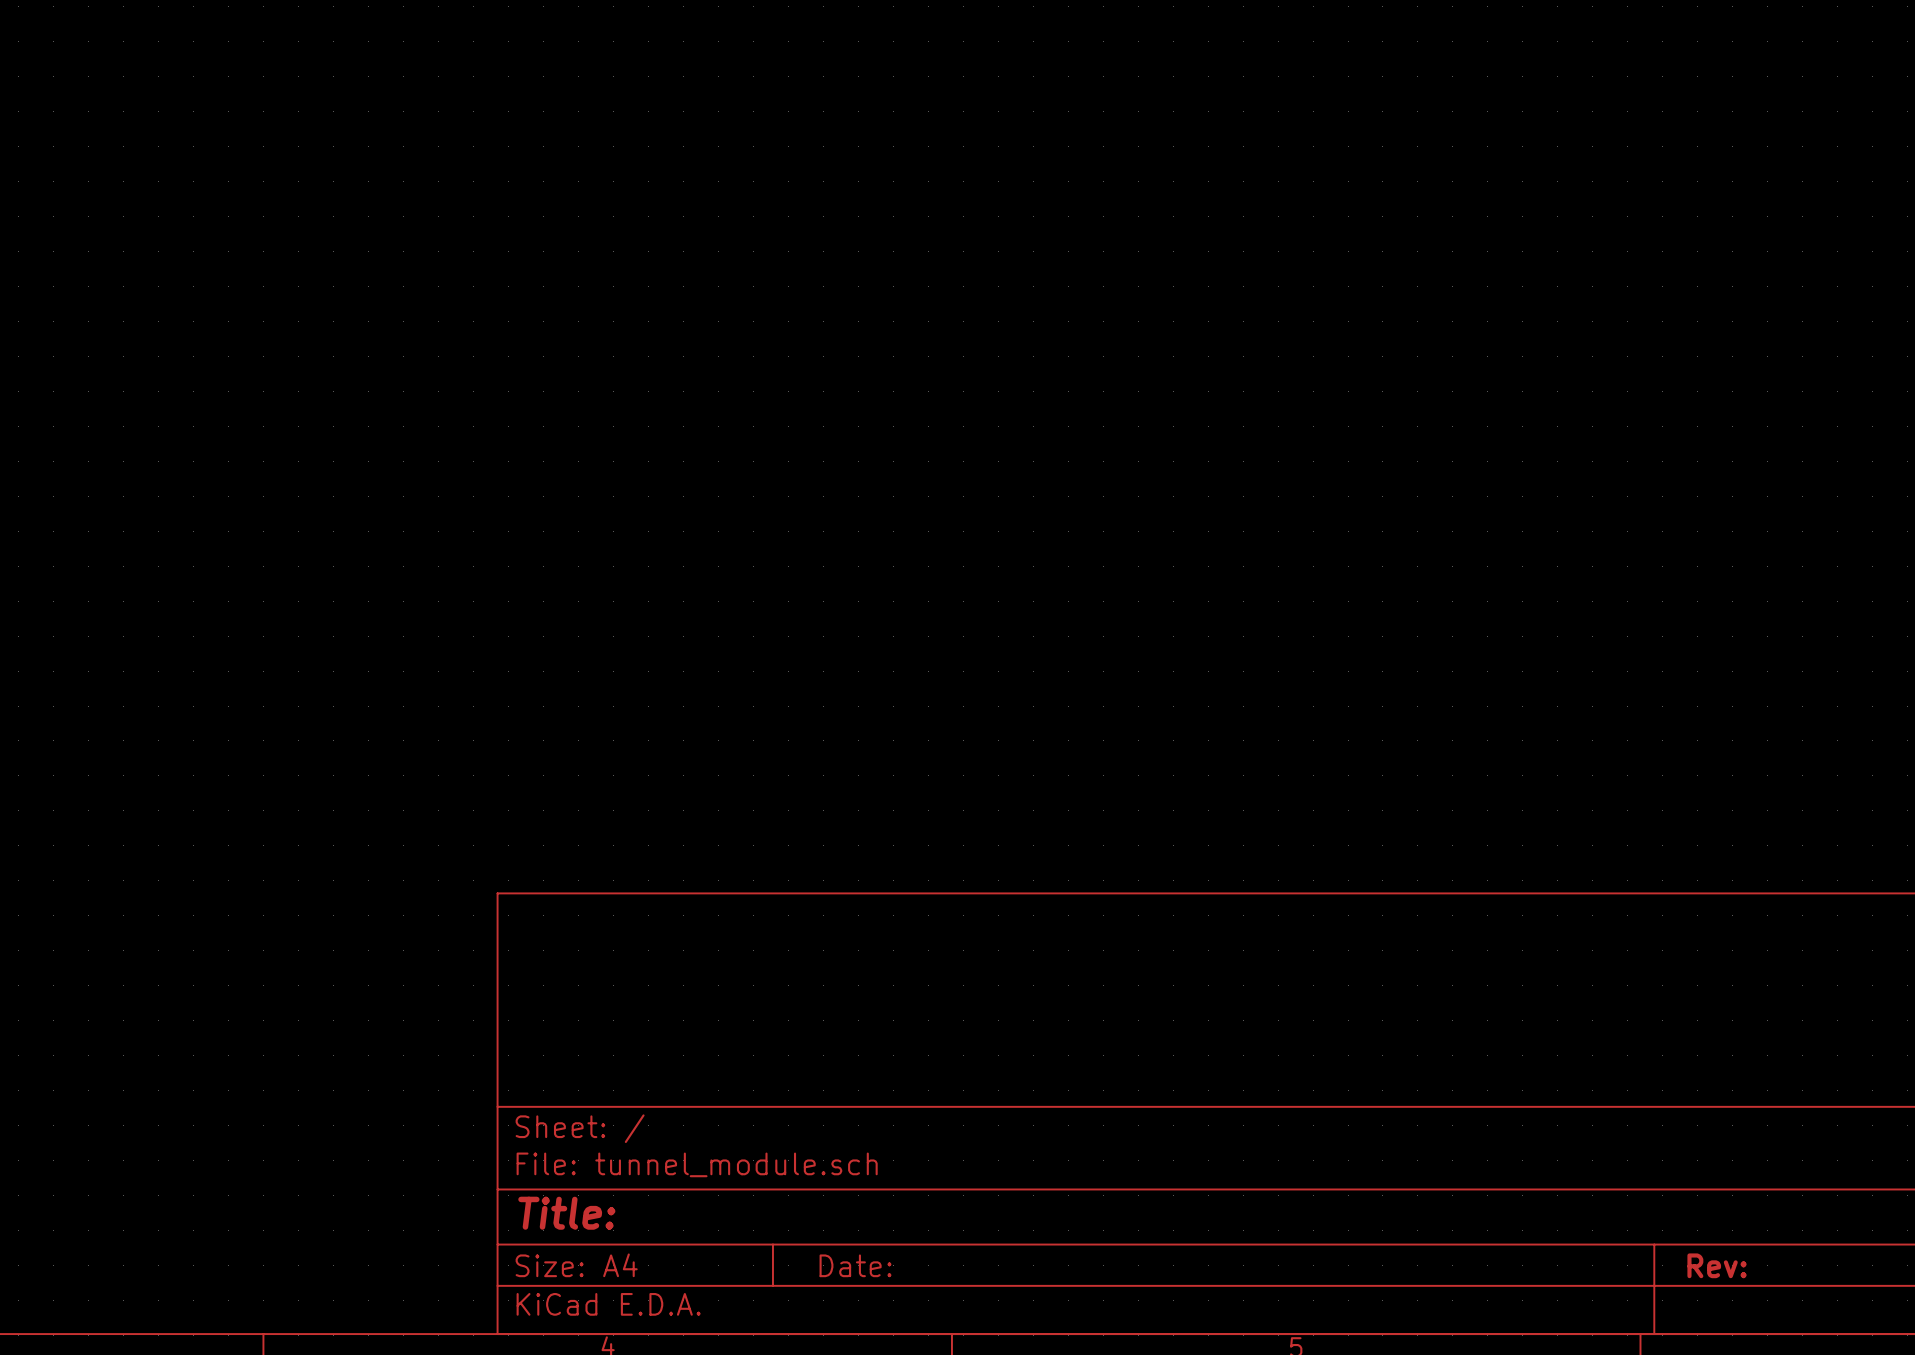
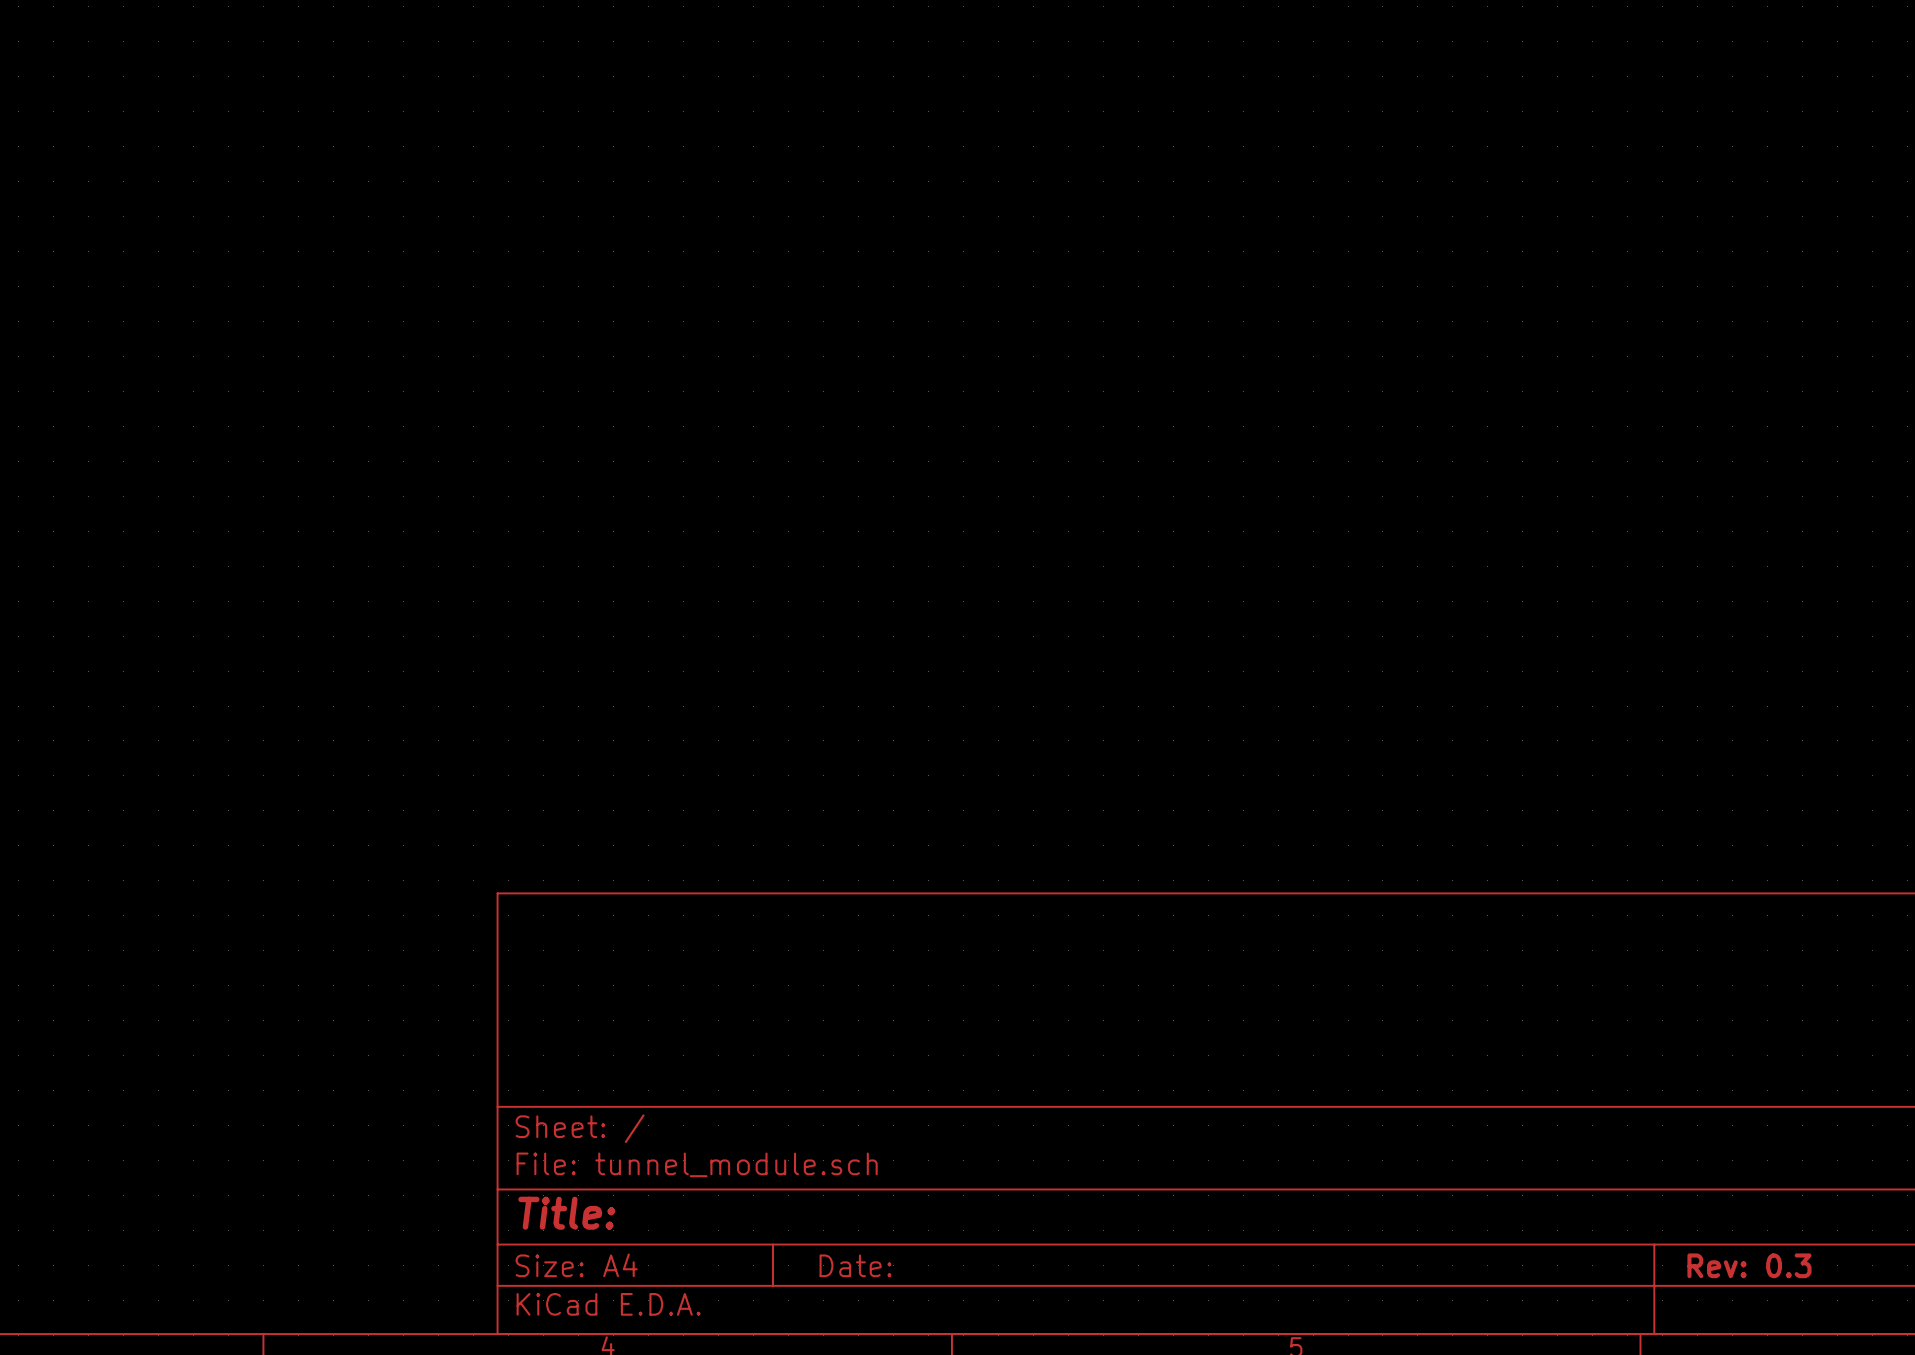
title block: Rev: (1717, 1265) -> Rev: 0.3 (1749, 1265)

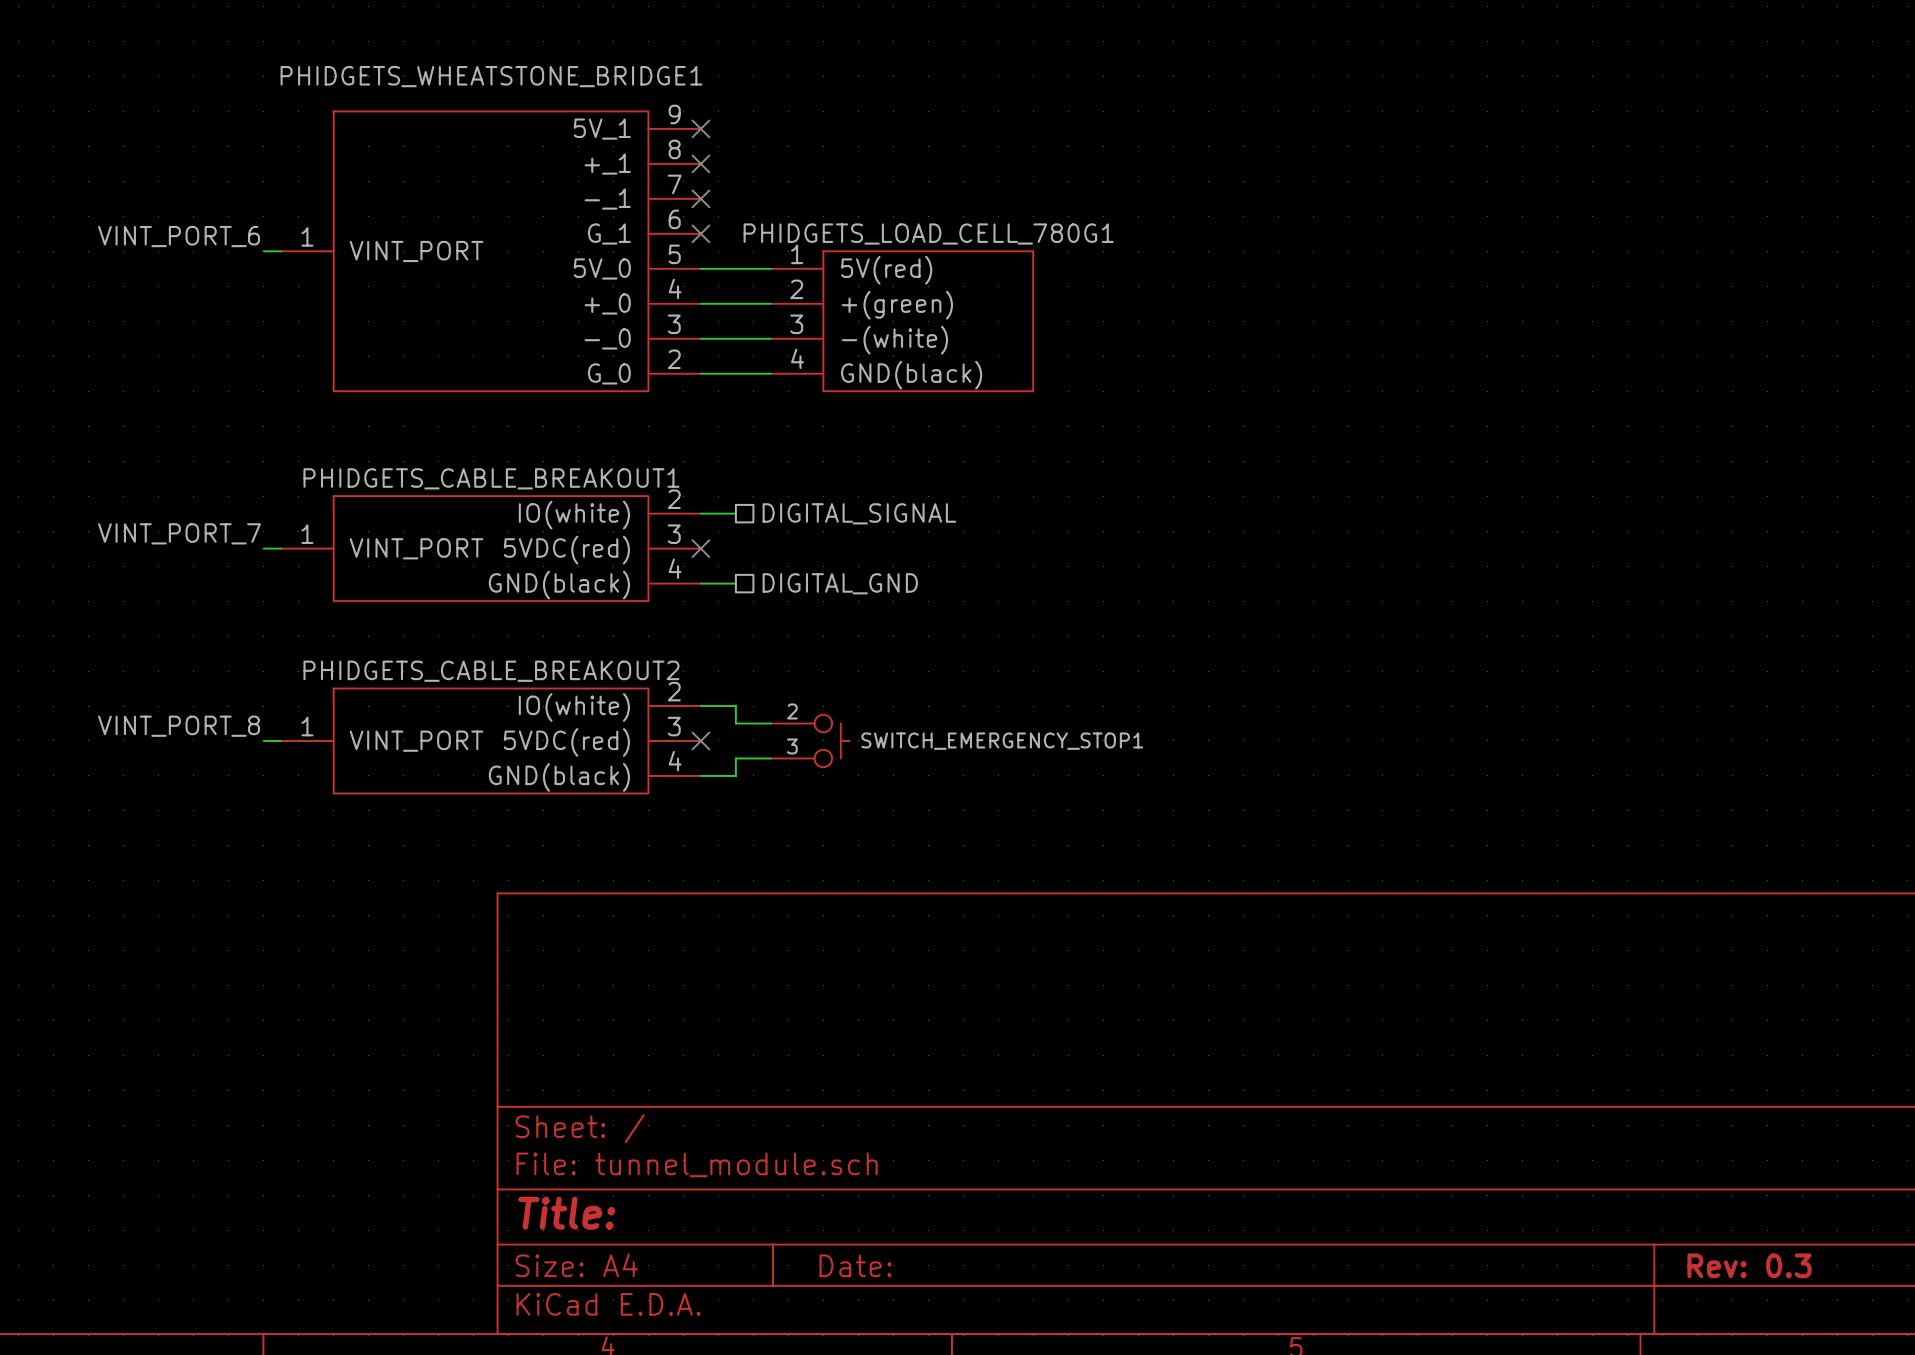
no-connect mark: none -> (700, 128)
no-connect mark: none -> (700, 163)
no-connect mark: none -> (700, 198)
no-connect mark: none -> (700, 233)
label: none -> VINT_PORT_6 (179, 236)
wire: none -> (263, 251) (281, 251)
PHIDGETS_WHEATSTONE_BRIDGE1: none -> (491, 251)
wire: none -> (700, 268) (770, 268)
wire: none -> (700, 303) (770, 303)
PHIDGETS_LOAD_CELL_780G1: none -> (902, 321)
wire: none -> (700, 338) (770, 338)
wire: none -> (700, 373) (770, 373)
wire: none -> (700, 513) (735, 513)
hierarchical label: none -> DIGITAL_SIGNAL (859, 513)
label: none -> VINT_PORT_7 (179, 533)
wire: none -> (263, 548) (281, 548)
PHIDGETS_CABLE_BREAKOUT1: none -> (491, 548)
no-connect mark: none -> (700, 548)
wire: none -> (700, 583) (735, 583)
hierarchical label: none -> DIGITAL_GND (840, 583)
wire: none -> (700, 706) (735, 706) (735, 723) (770, 723)
label: none -> VINT_PORT_8 (179, 726)
wire: none -> (263, 740) (281, 740)
PHIDGETS_CABLE_BREAKOUT2: none -> (491, 740)
no-connect mark: none -> (700, 740)
SWITCH_EMERGENCY_STOP1: none -> (810, 740)
wire: none -> (770, 758) (735, 758) (735, 775) (700, 775)

